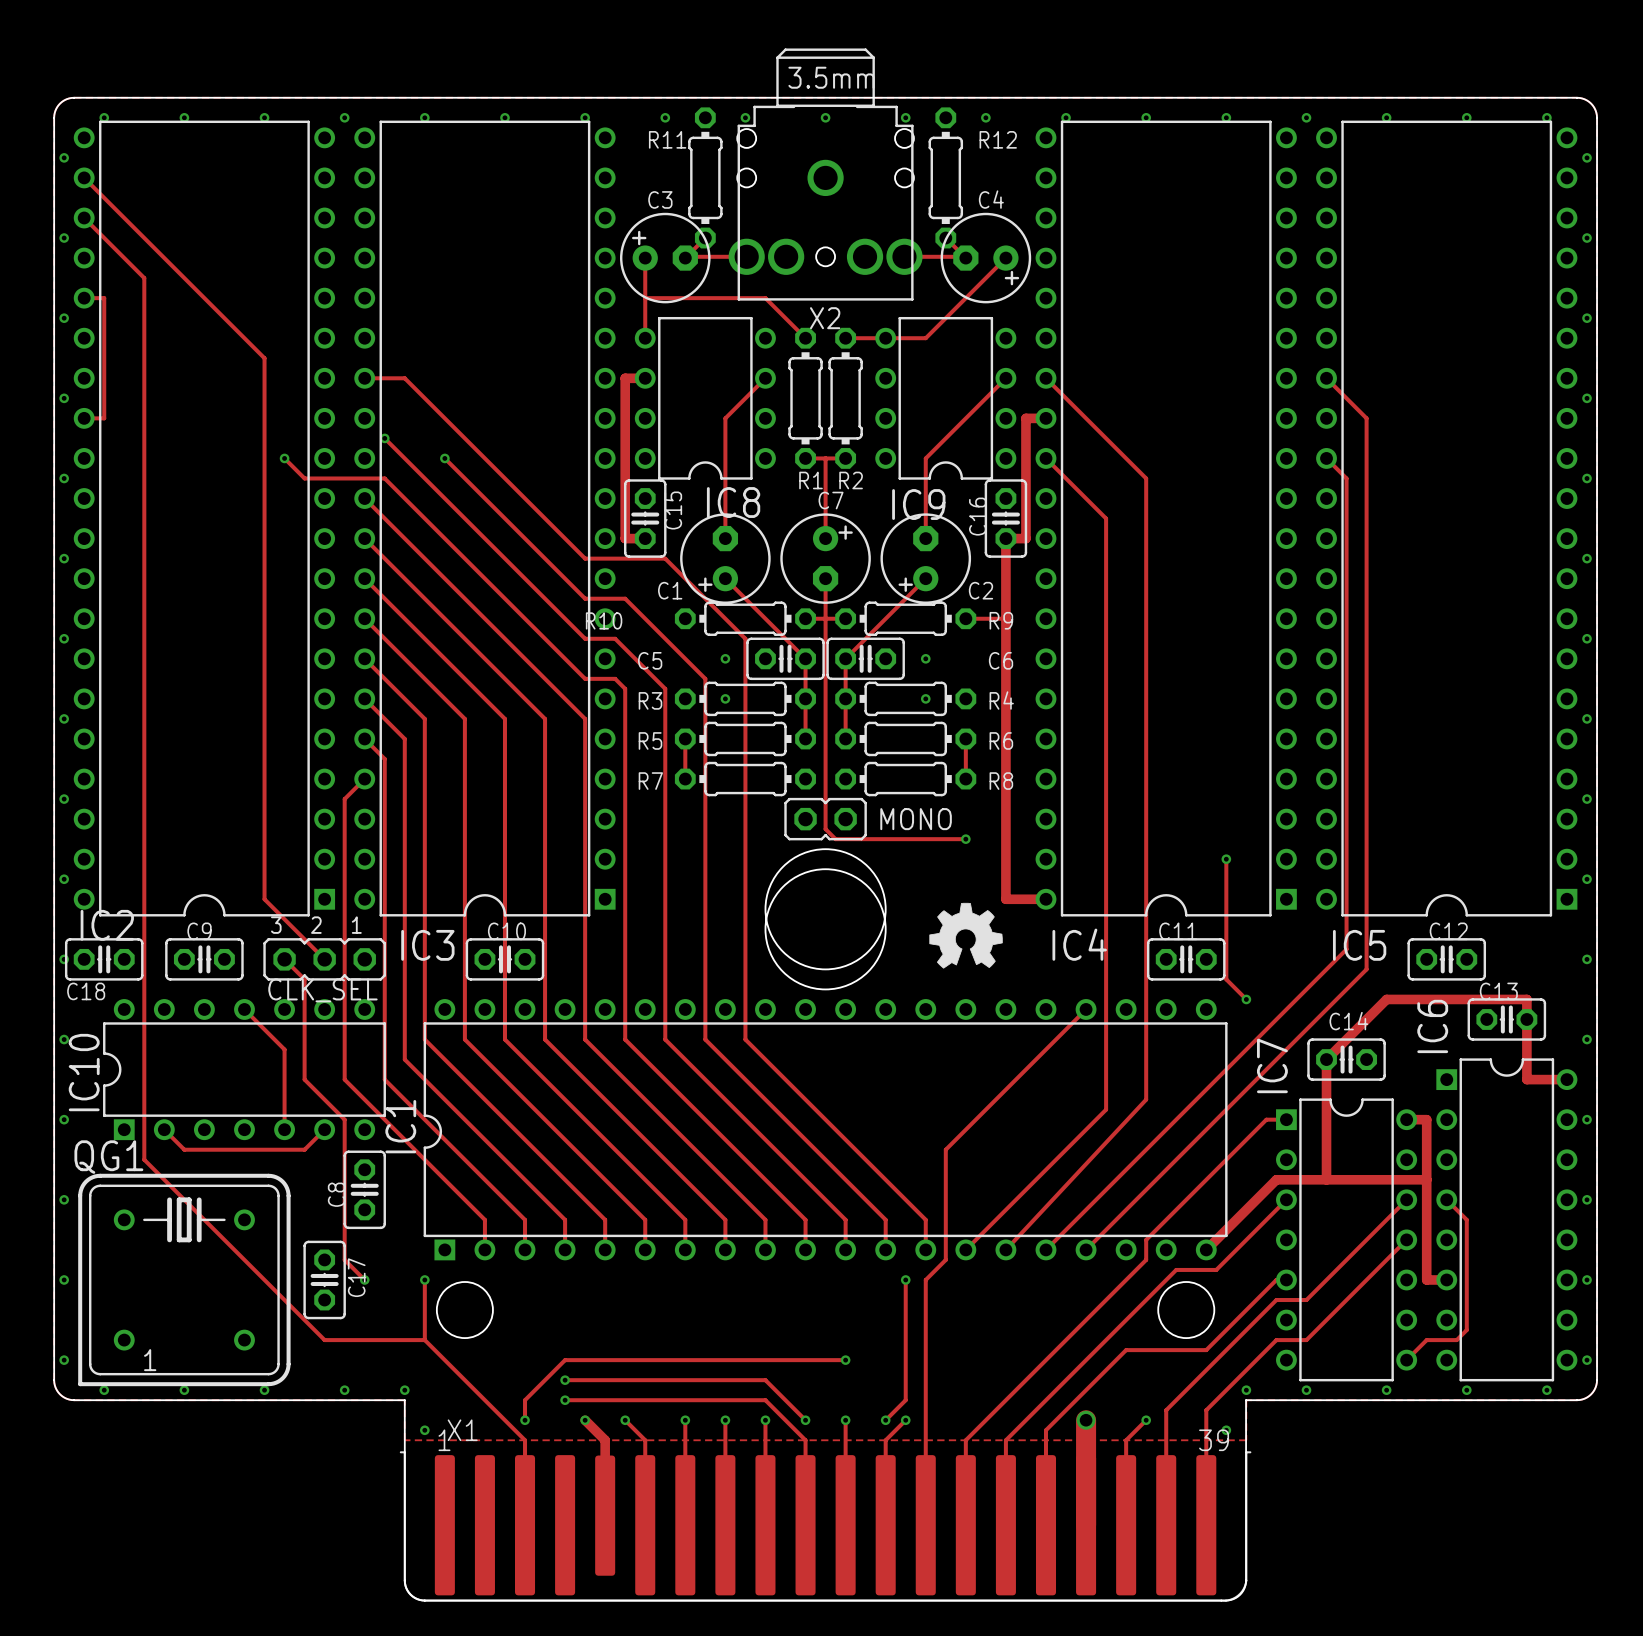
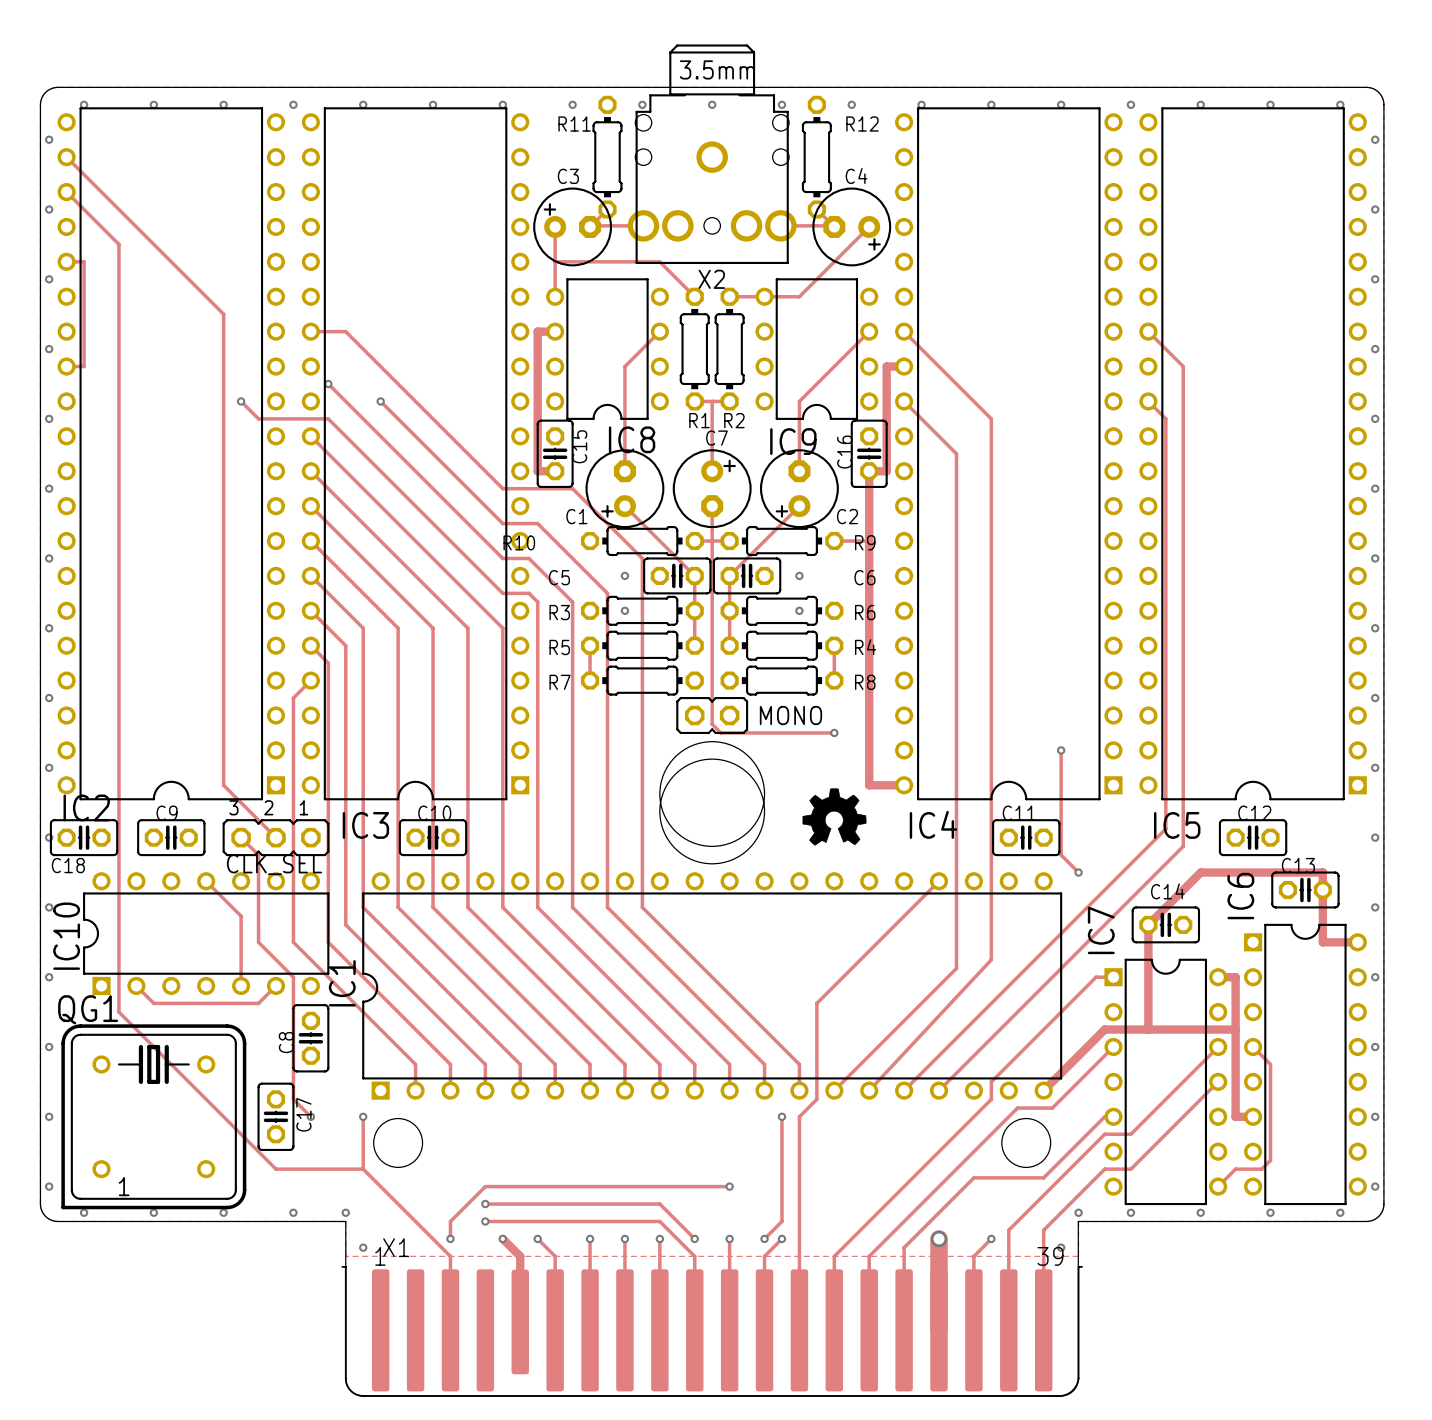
R4 name position: R4 (1001, 700) -> R4 (865, 647)
R6 name position: R6 (1001, 740) -> R6 (865, 612)

